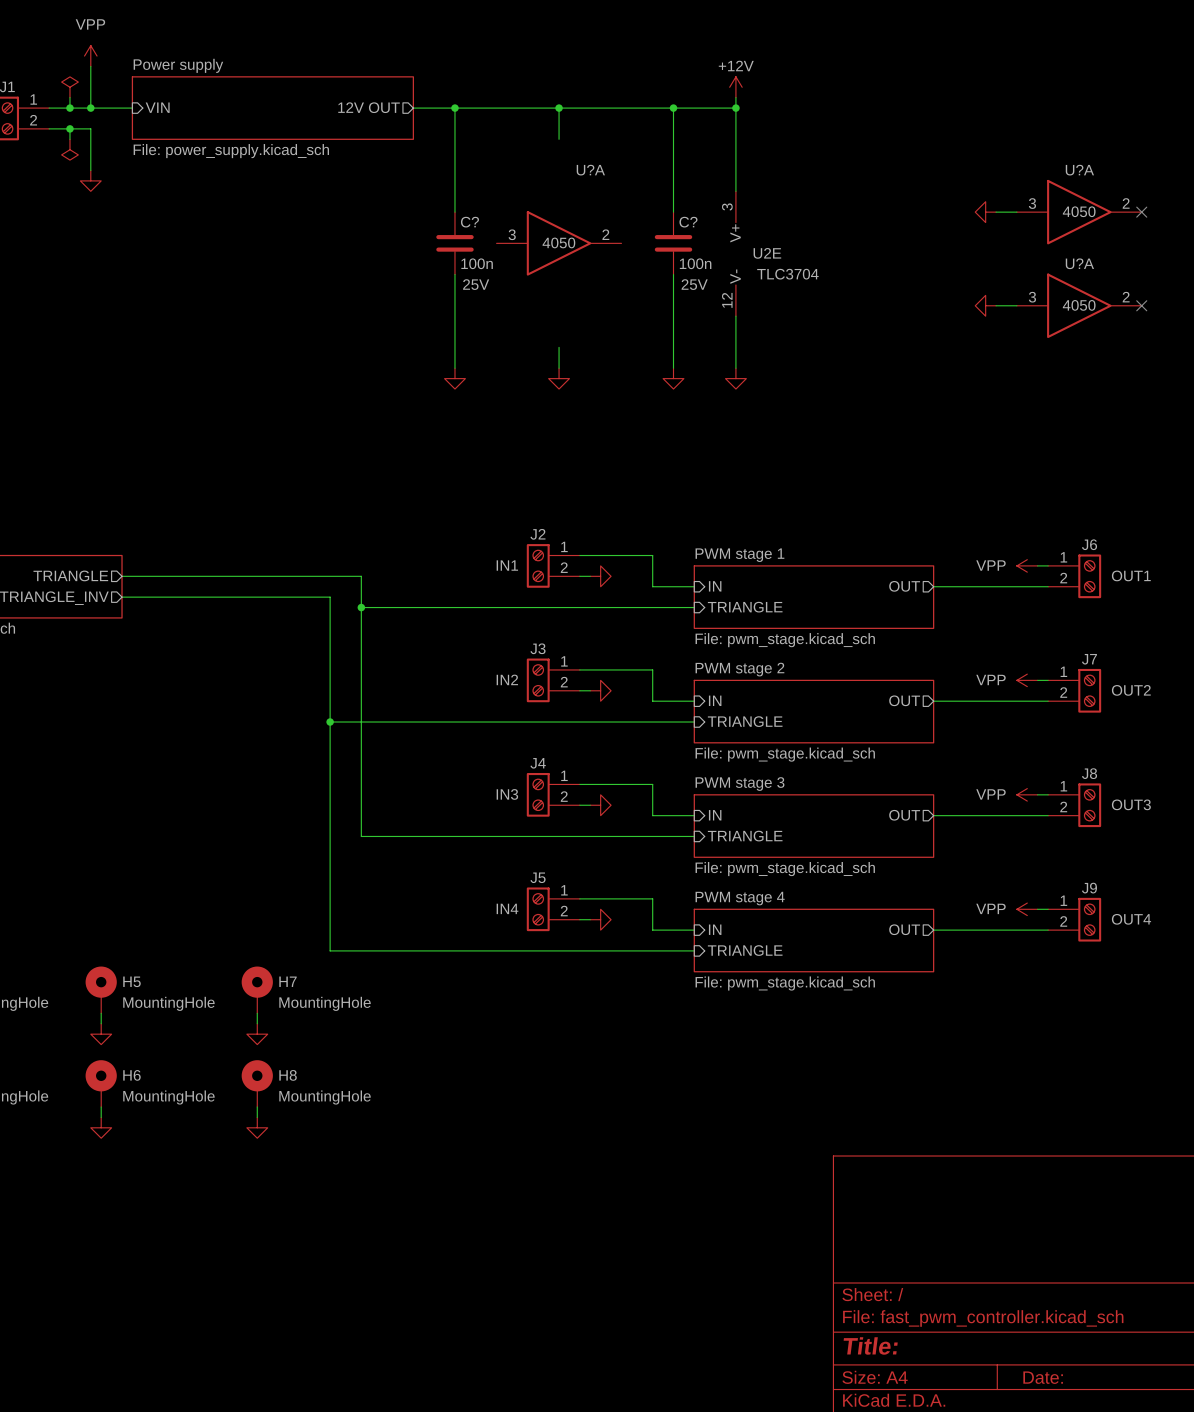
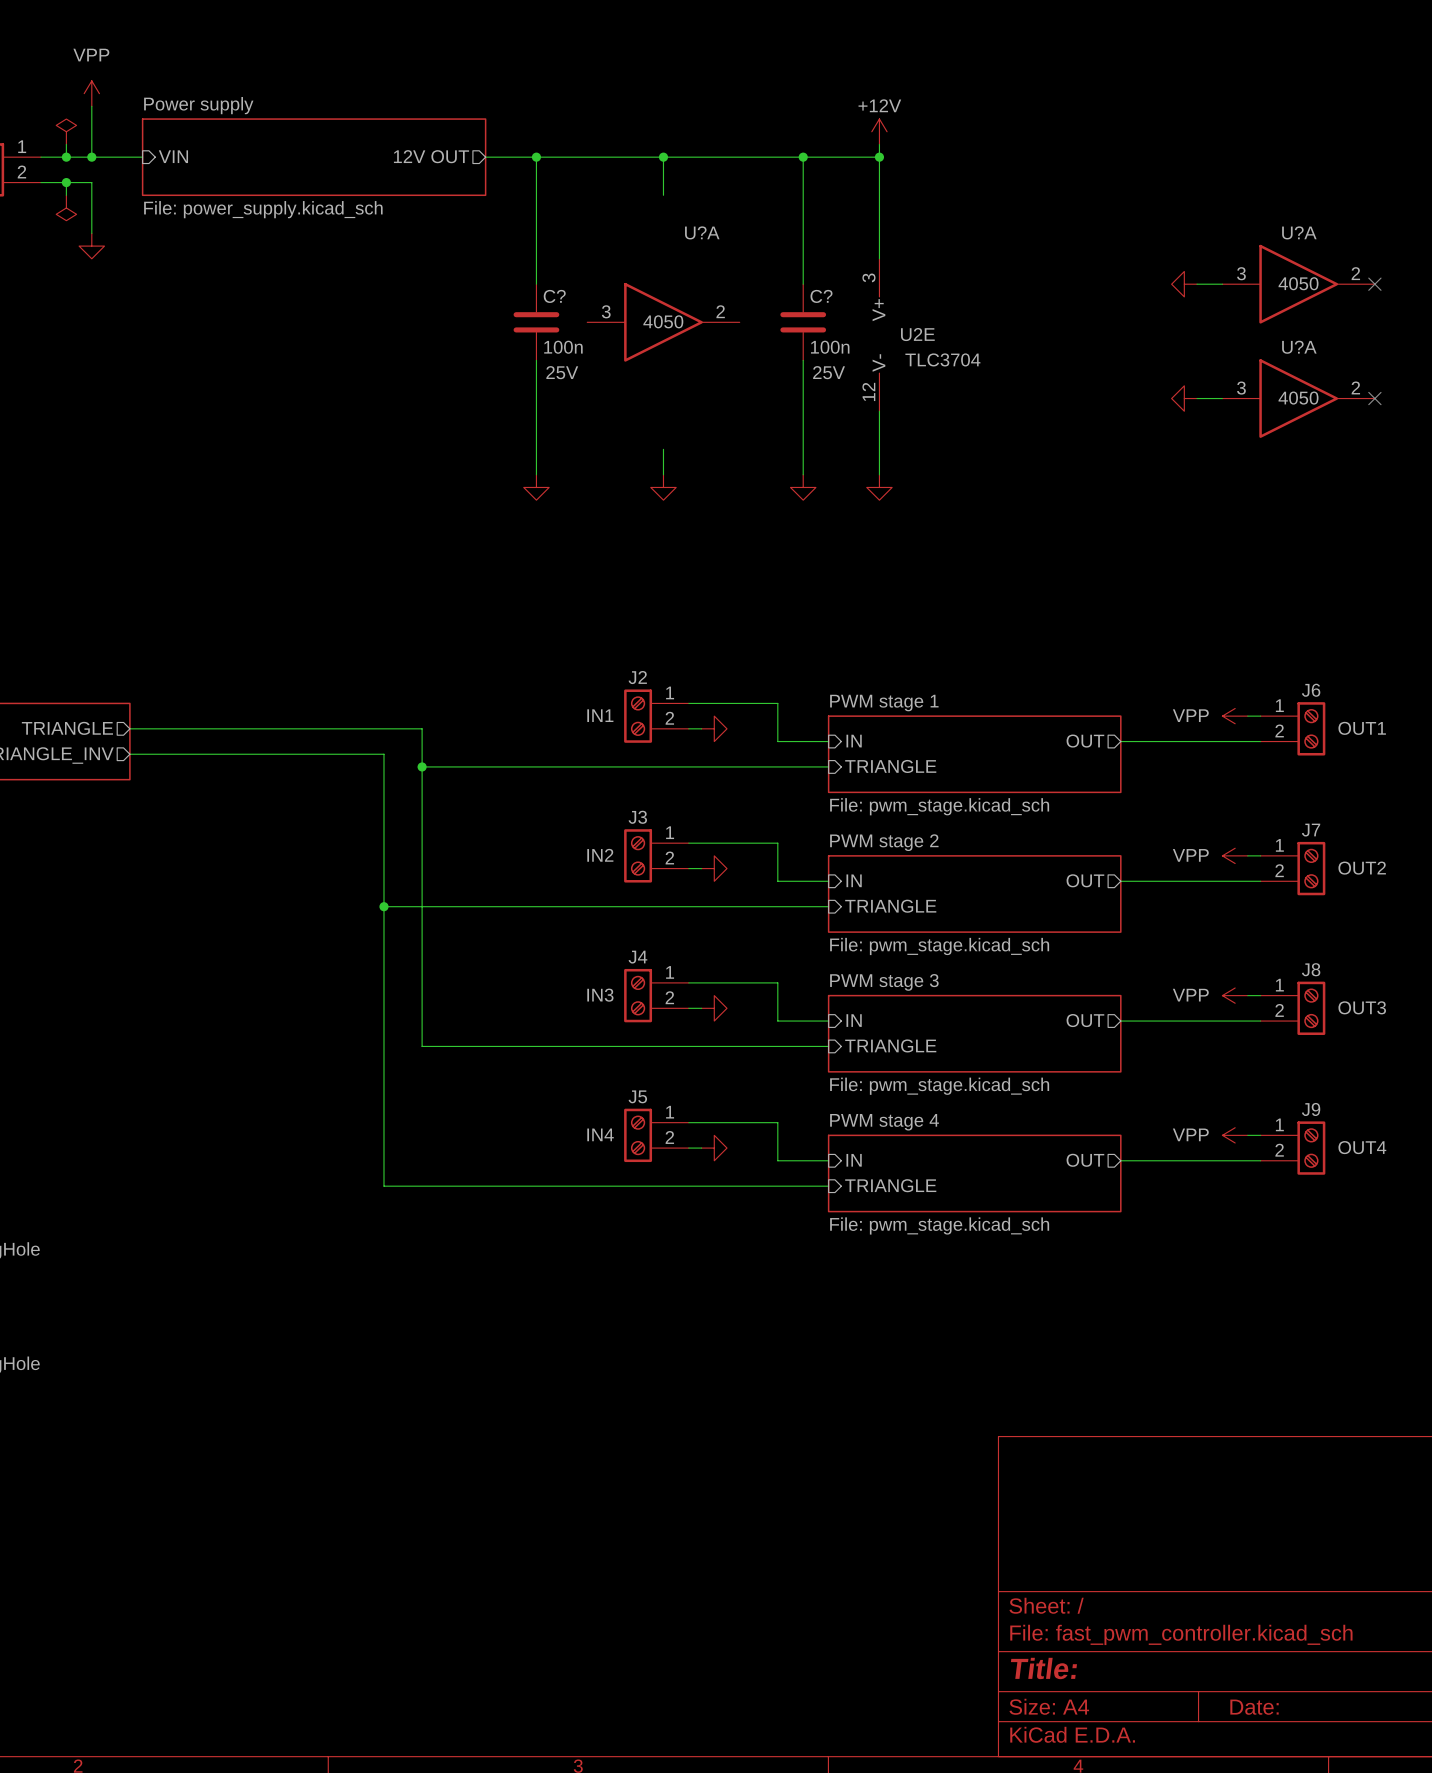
H5: MountingHole (101, 989) -> none
H7: MountingHole (257, 989) -> none
wire: (101, 1013) (101, 1023) -> none
wire: (257, 1013) (257, 1023) -> none
power symbol: (101, 1034) -> none
power symbol: (257, 1034) -> none
H6: MountingHole (101, 1083) -> none
H8: MountingHole (257, 1083) -> none
wire: (101, 1107) (101, 1117) -> none
wire: (257, 1107) (257, 1117) -> none
power symbol: (101, 1127) -> none
power symbol: (257, 1127) -> none

